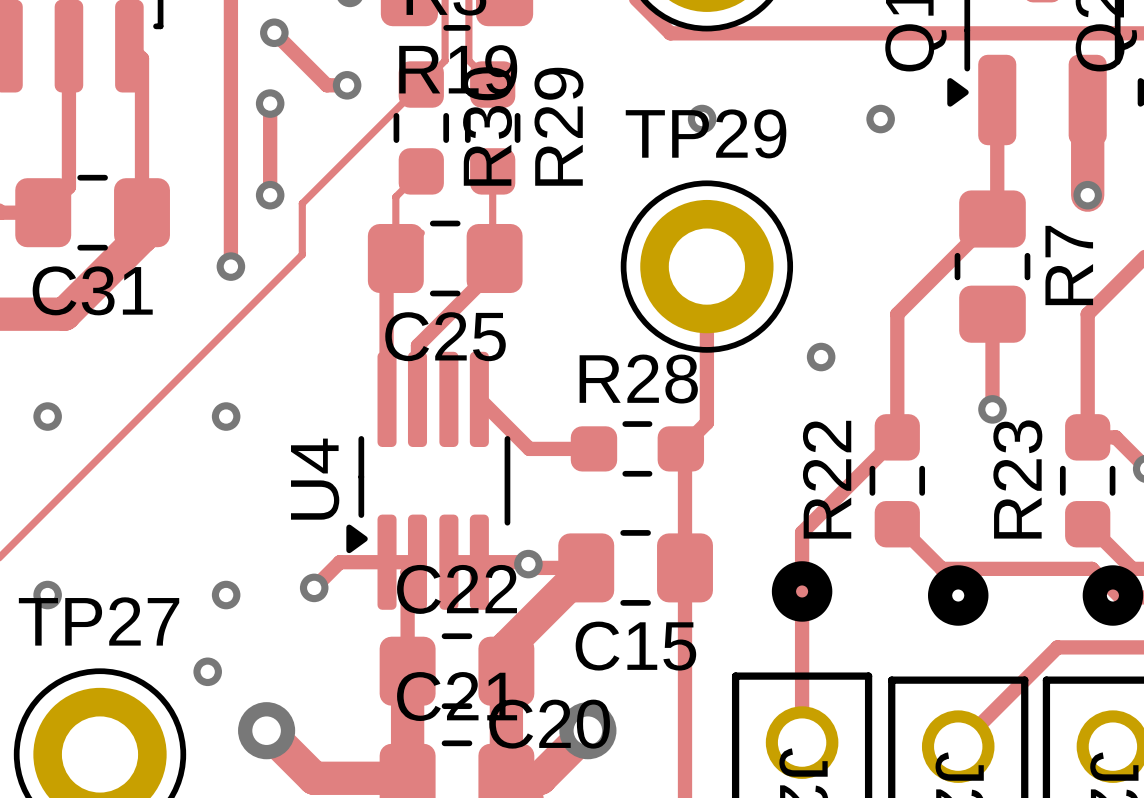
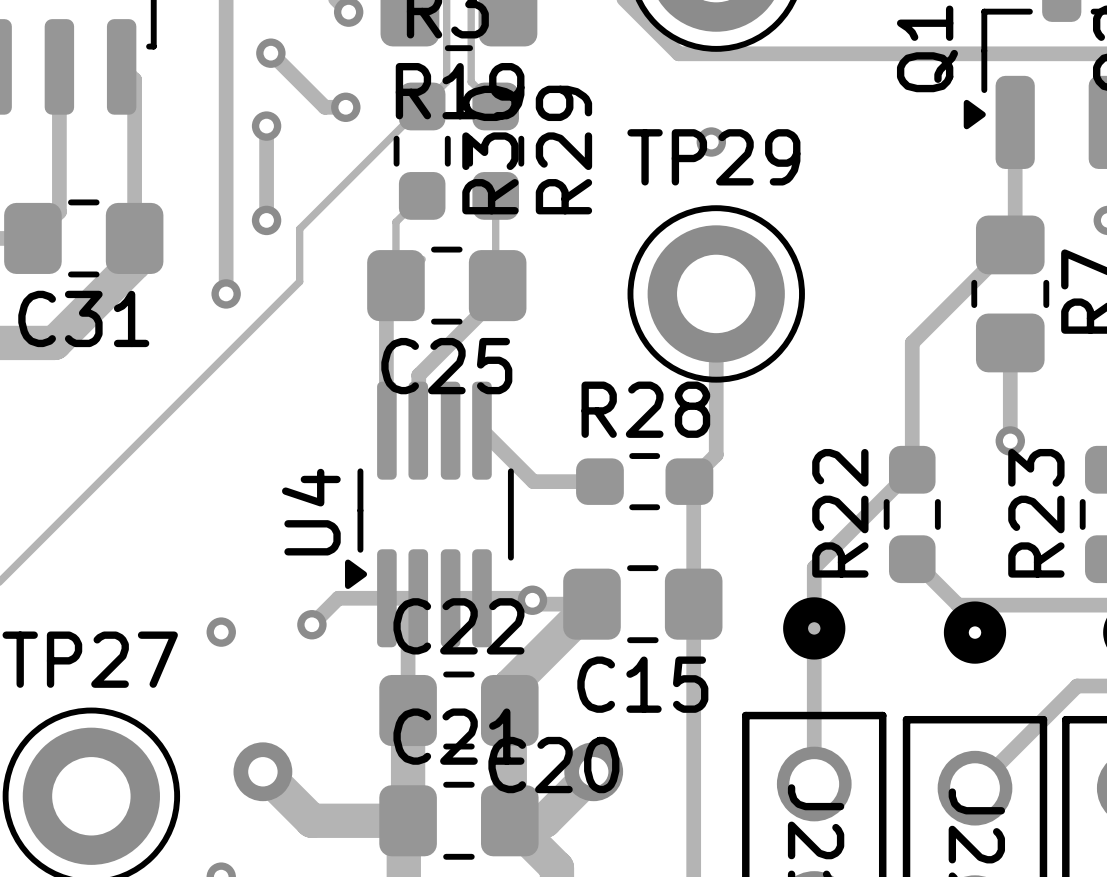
via: (880, 119) -> none
via: (821, 357) -> none
via: (47, 416) -> none
via: (226, 416) -> none
via: (47, 595) -> none
via: (207, 671) -> none

